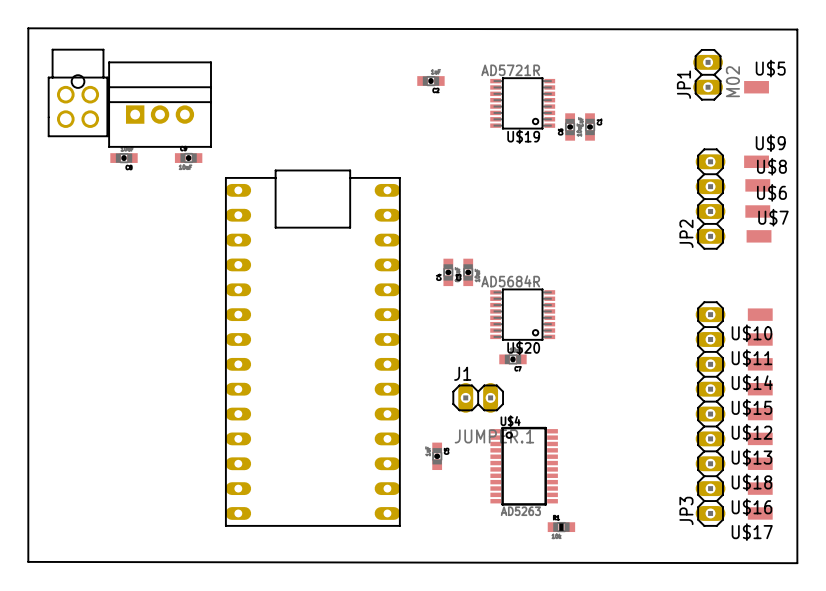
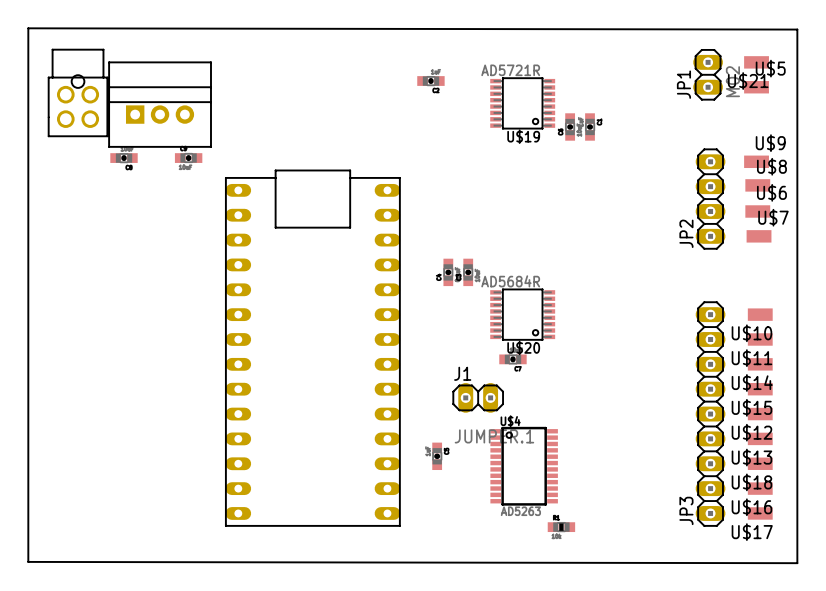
U$21: none -> (756, 62)

